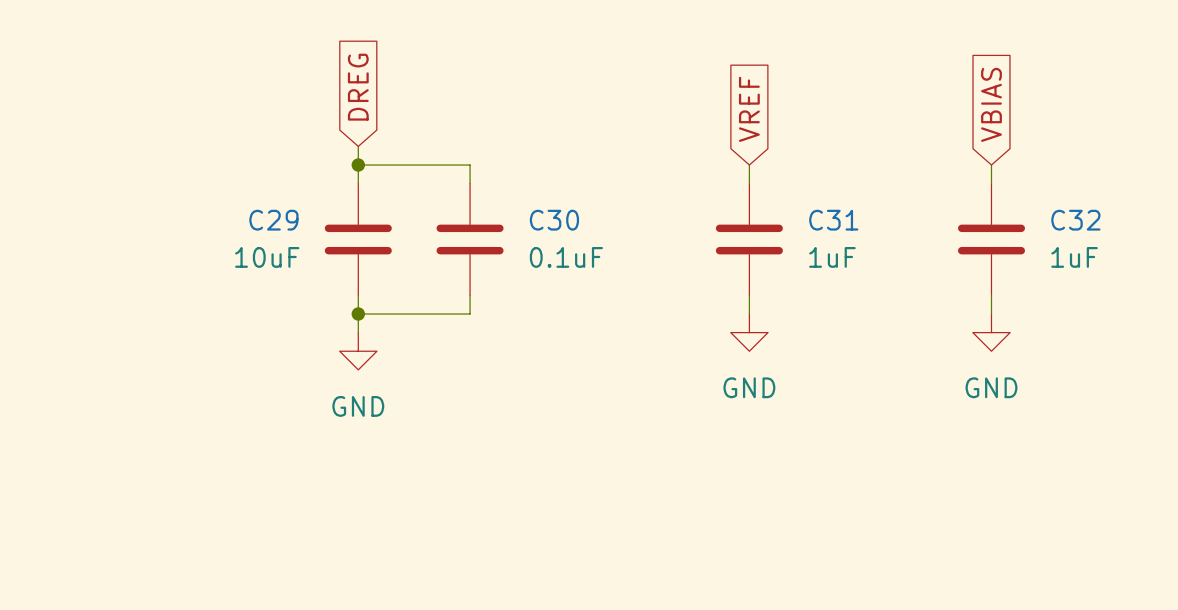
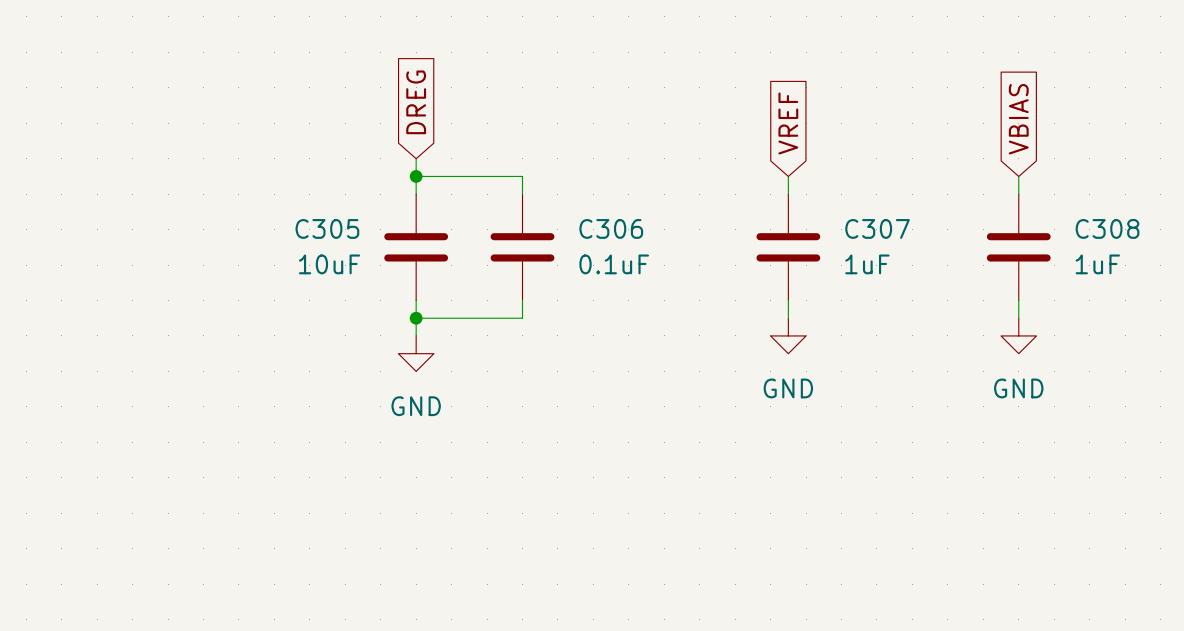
C29 name: C29 (273, 220) -> C305 (327, 228)
C30 name: C30 (554, 220) -> C306 (611, 228)
C31 name: C31 (833, 220) -> C307 (877, 228)
C32 name: C32 (1075, 220) -> C308 (1107, 228)

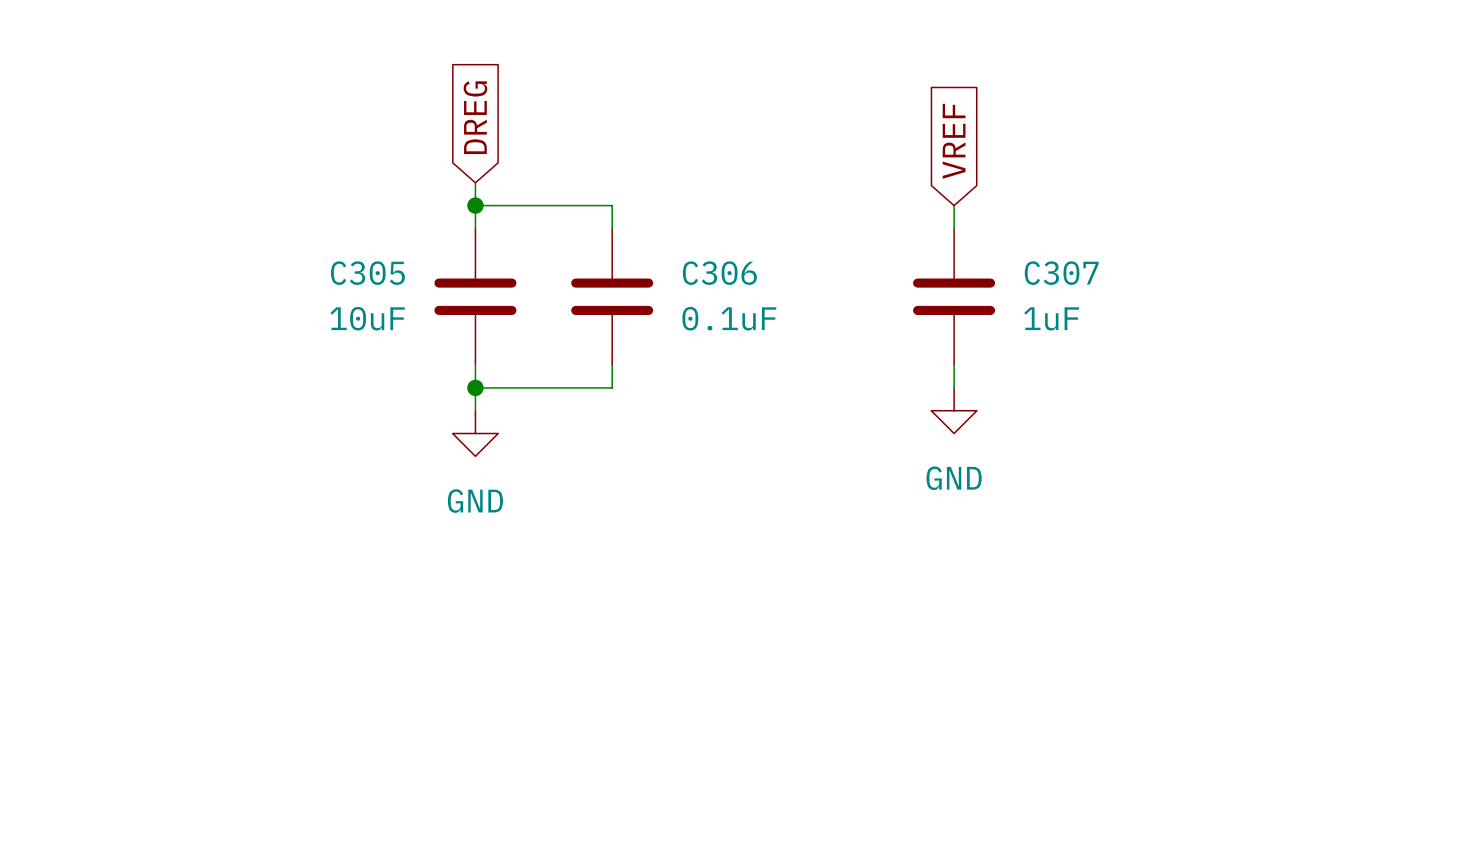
global label: VBIAS (1018, 119) -> none
wire: (1018, 176) (1018, 194) -> none
C308: 1uF (1018, 247) -> none
wire: (1018, 300) (1018, 318) -> none
power symbol: GND (1018, 335) -> none

